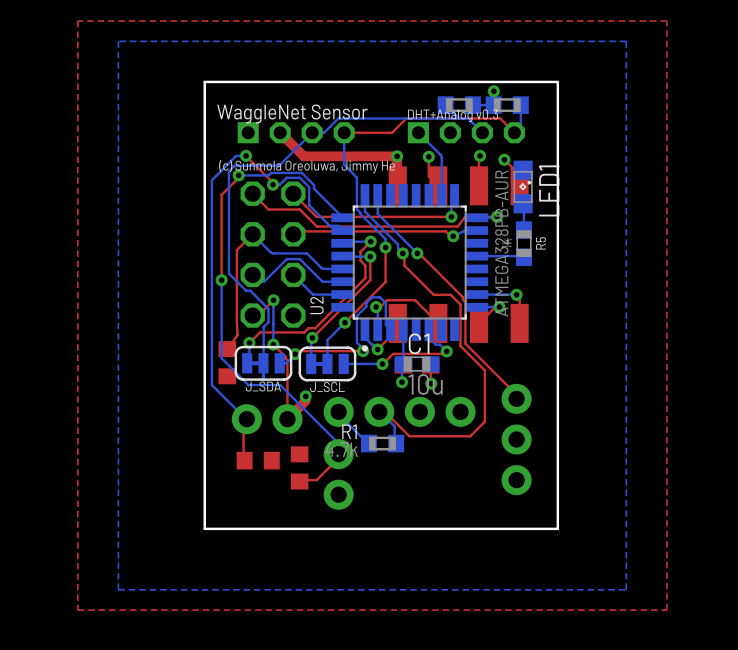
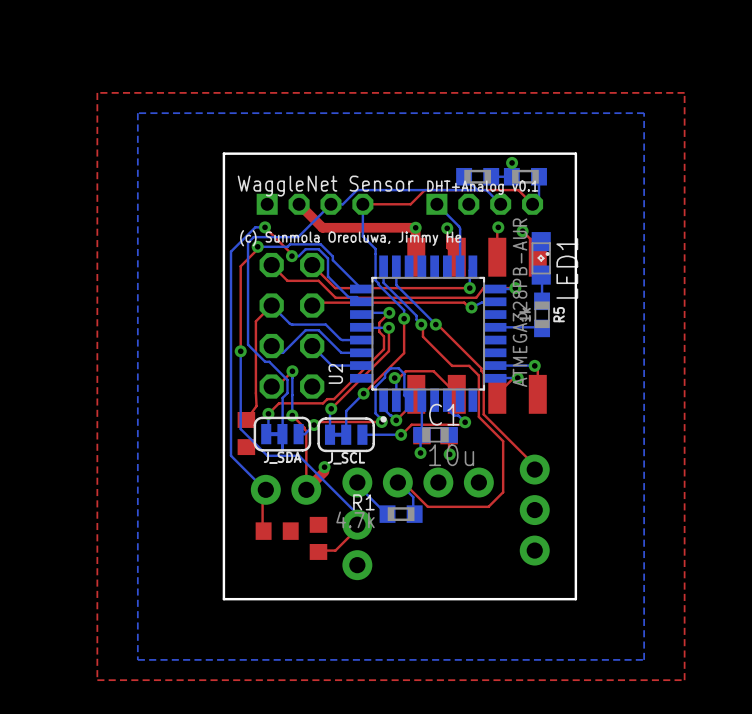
text: DHT+Analog v0.3 (453, 115) -> DHT+Analog v0.1 (482, 187)

